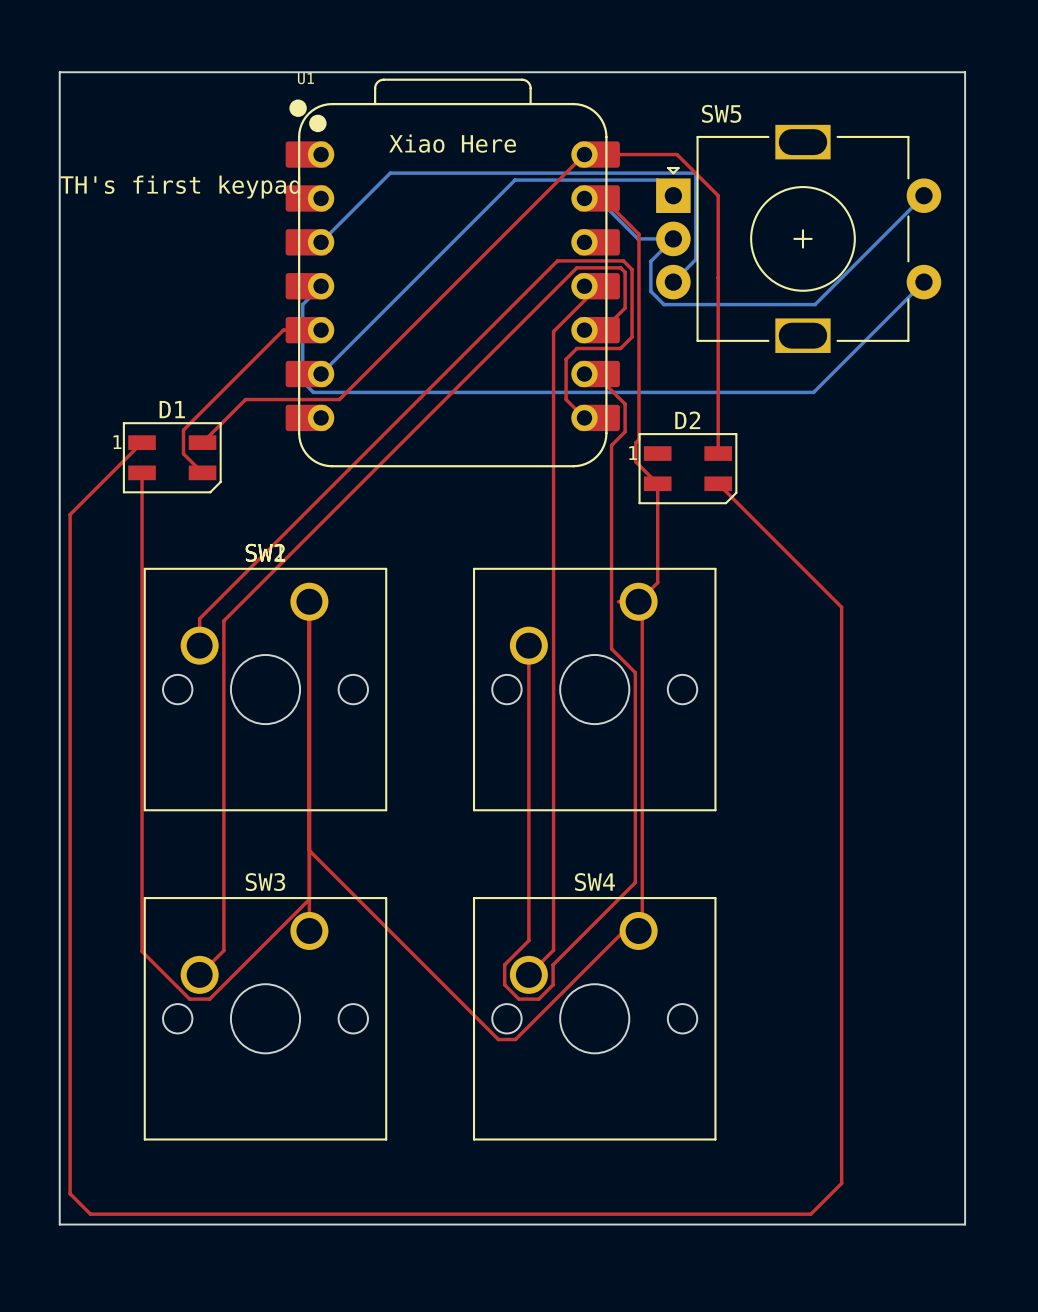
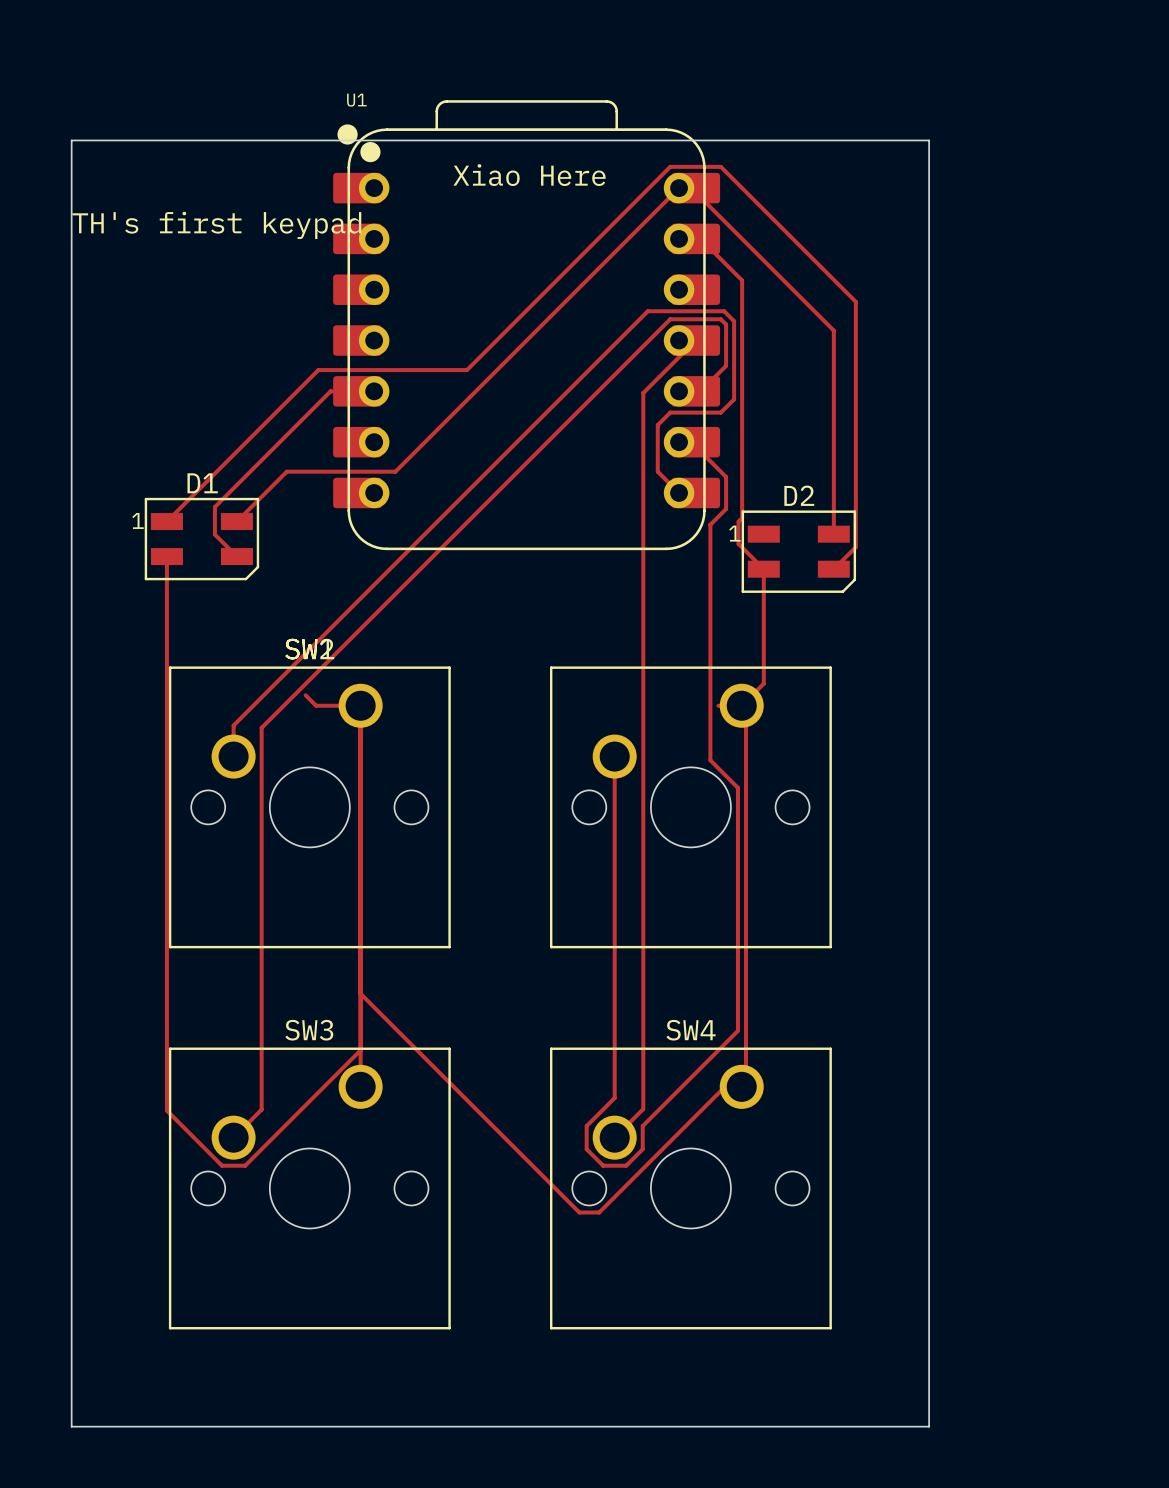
board edge: (59, 113) (59, 72) (965, 72) (965, 1224) (800, 1224) -> (71, 140) (929, 140) (929, 1426)
top track: (595, 154) (677, 154) (718, 195) (718, 277) -> (691, 188) (833, 330)
bottom track: (695, 173) (390, 173) (321, 242) -> none
bottom track: (695, 173) (695, 259) (673, 282) -> none
bottom track: (673, 195) (657, 180) (515, 180) (321, 374) -> none
bottom track: (923, 195) (815, 304) (664, 304) (650, 291) (650, 261) (673, 238) (637, 238) (597, 198) (584, 198) -> none
SW5: (798, 238) -> none
bottom track: (923, 282) (813, 392) (313, 392) (302, 381) (302, 304) (321, 286) -> none
top track: (142, 442) (70, 514) (70, 1193) (90, 1214) (810, 1214) (841, 1183) (841, 607) (718, 483) -> (166, 521) (318, 370) (466, 370) (670, 166) (720, 166) (855, 301) (855, 547) (833, 569)
top track: none -> (305, 695) (316, 705) (360, 705)

